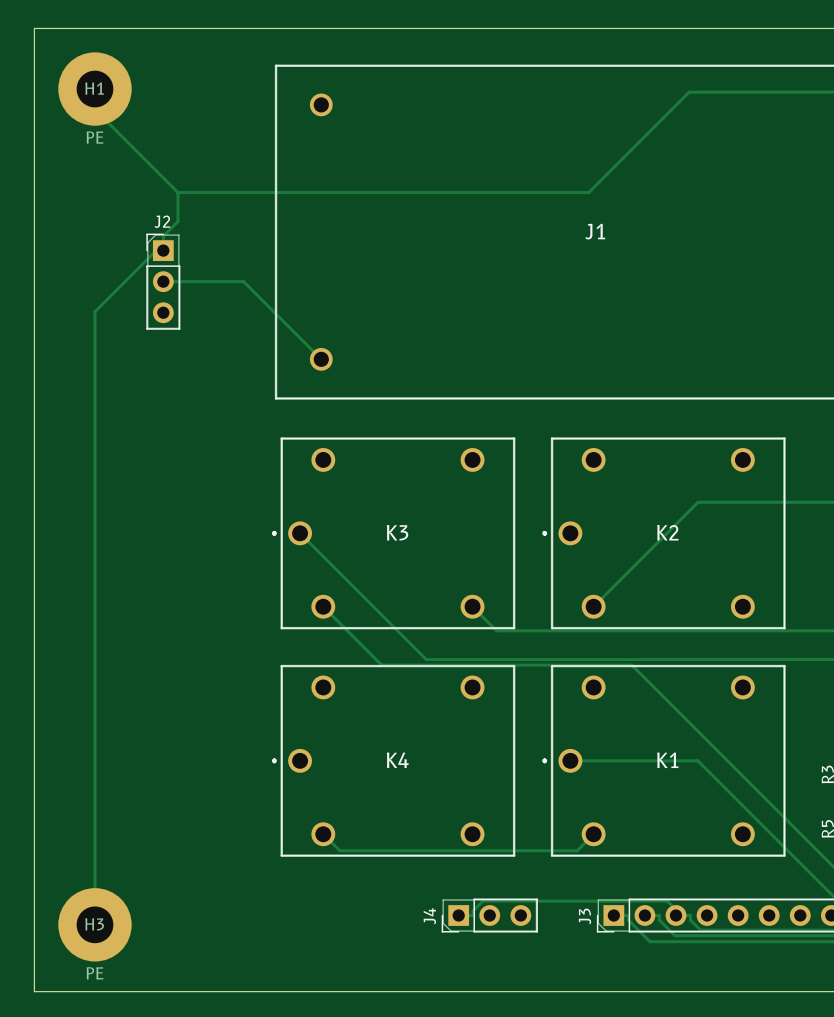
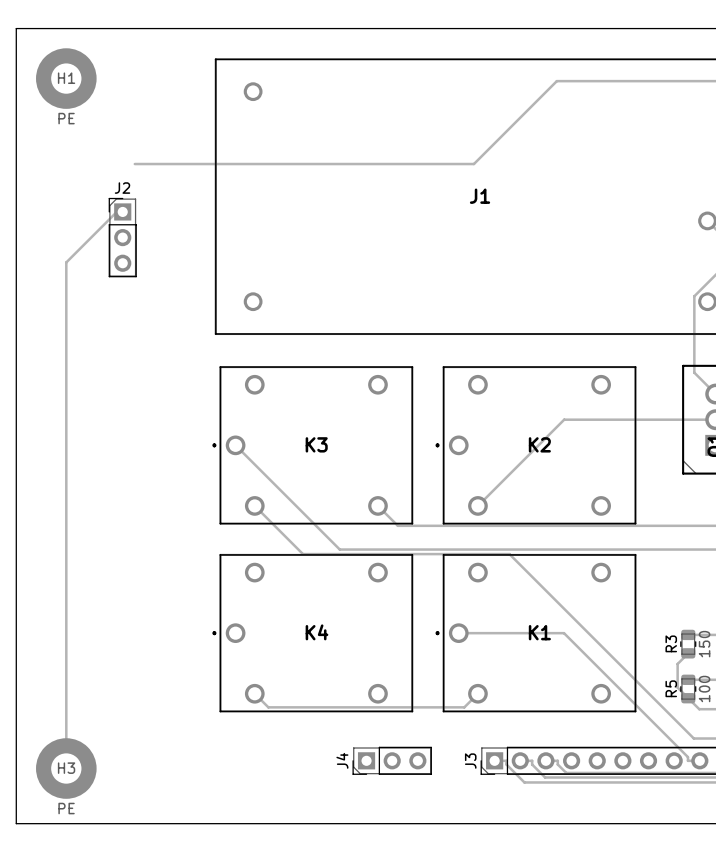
track: (94, 89) (94, 109) (177, 192) (177, 221) (163, 236) (163, 250) -> none
track: (163, 281) (243, 281) (321, 359) -> none
track: (458, 915) (473, 915) (473, 911) (482, 901) (667, 901) (681, 915) -> none

